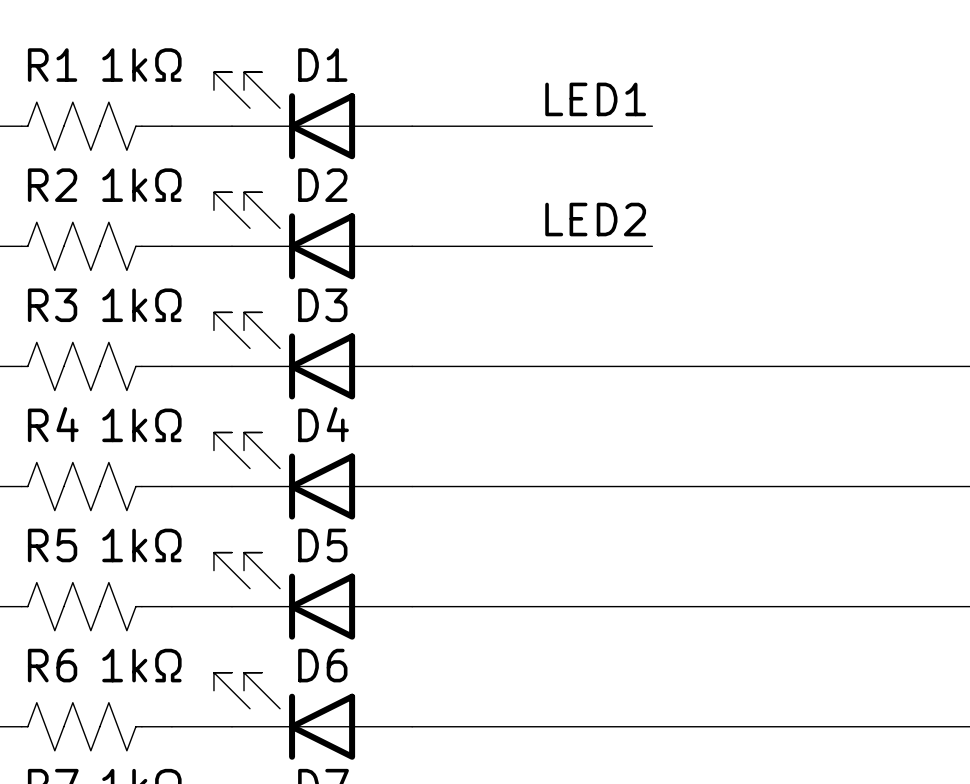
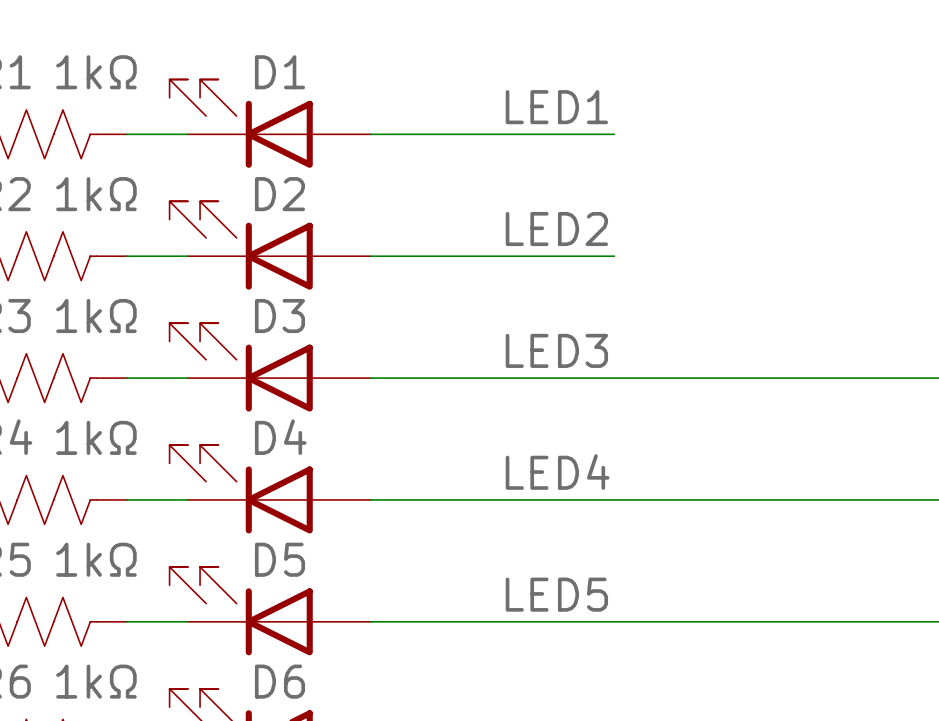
label: none -> LED3 (556, 350)
label: none -> LED4 (557, 472)
label: none -> LED5 (556, 594)

